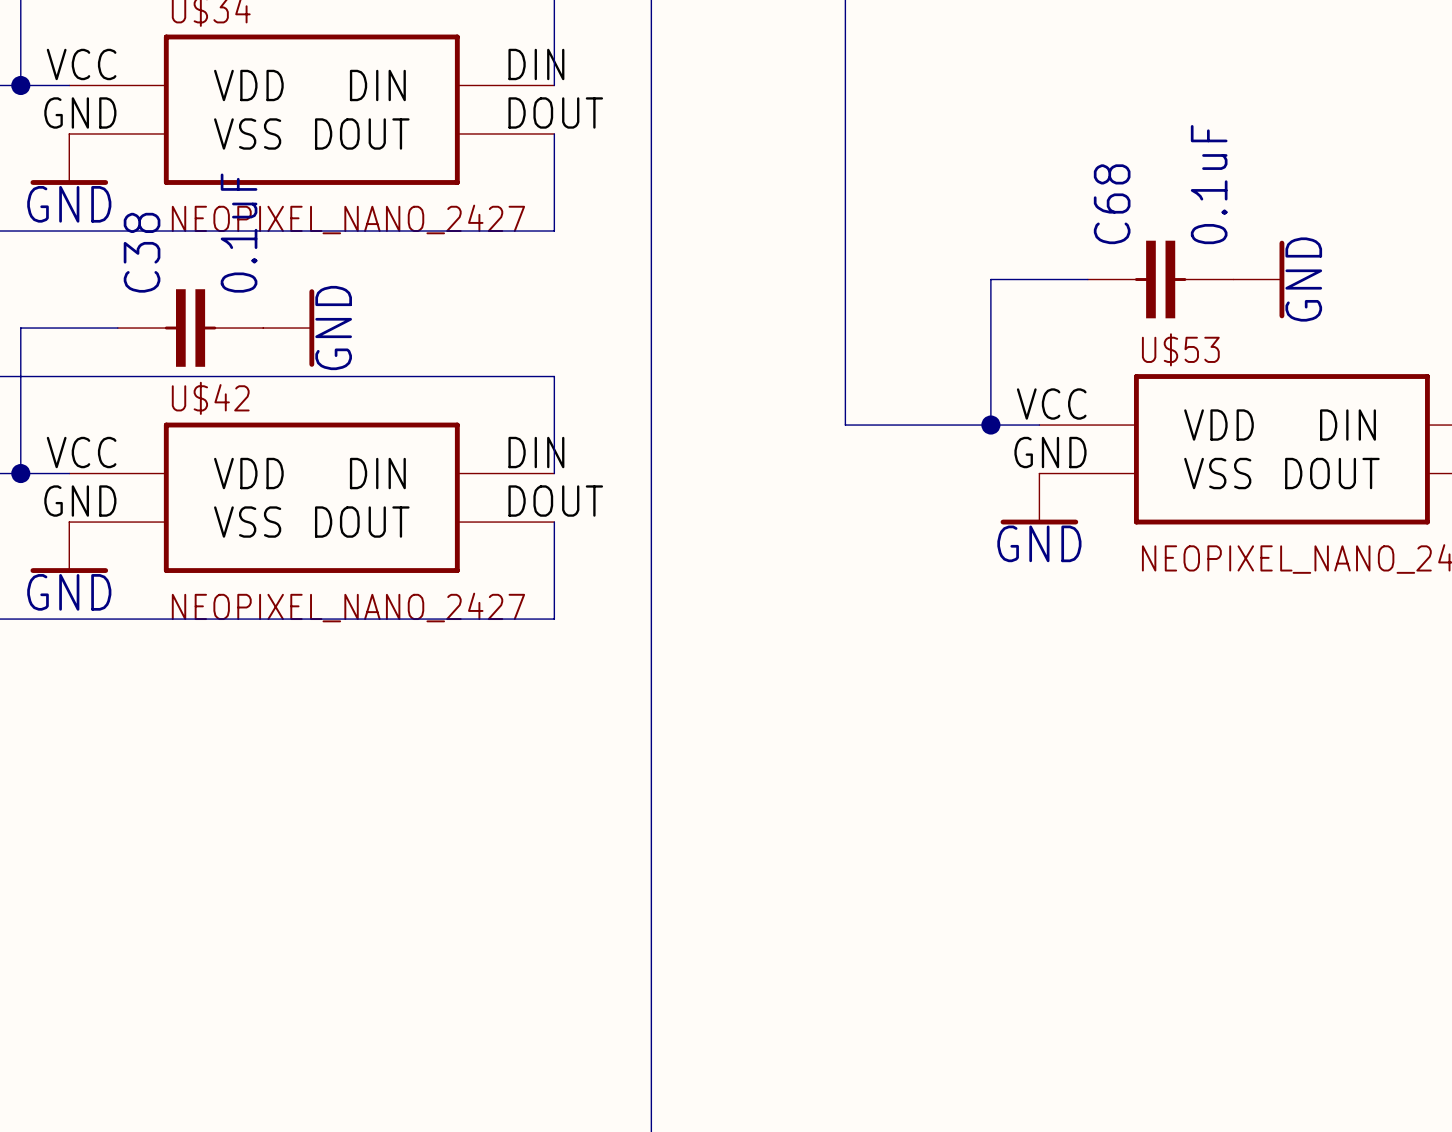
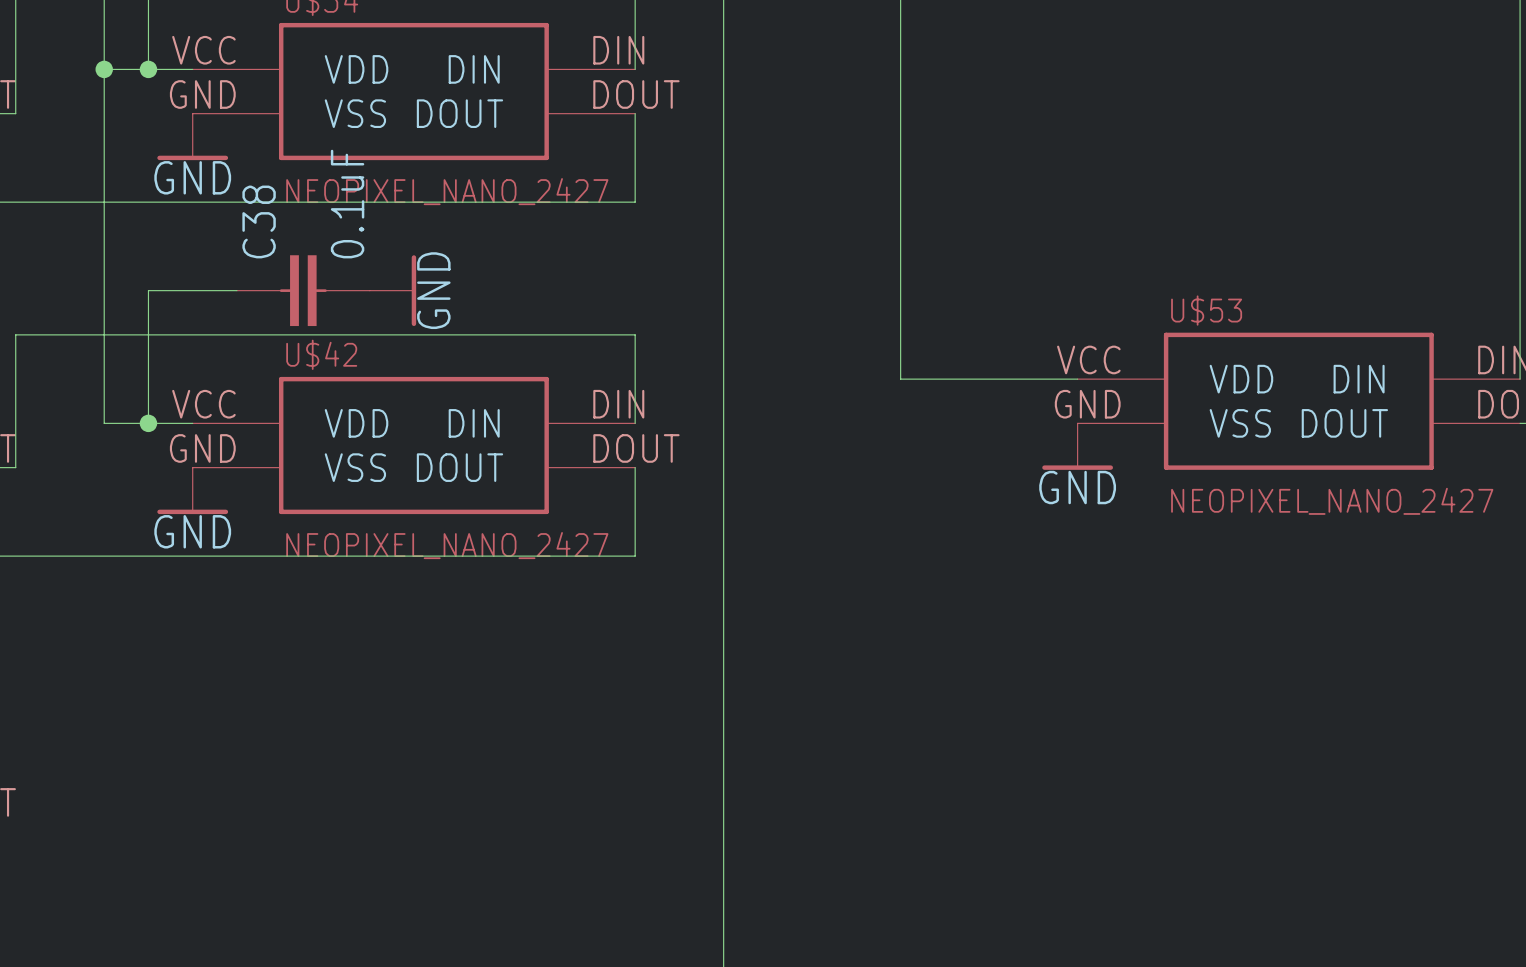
wire: (1087, 279) (990, 279) (990, 425) -> none
C68: 0.1uF (1160, 279) -> none
power symbol: GND (1258, 279) -> none
junction: (990, 425) -> none

